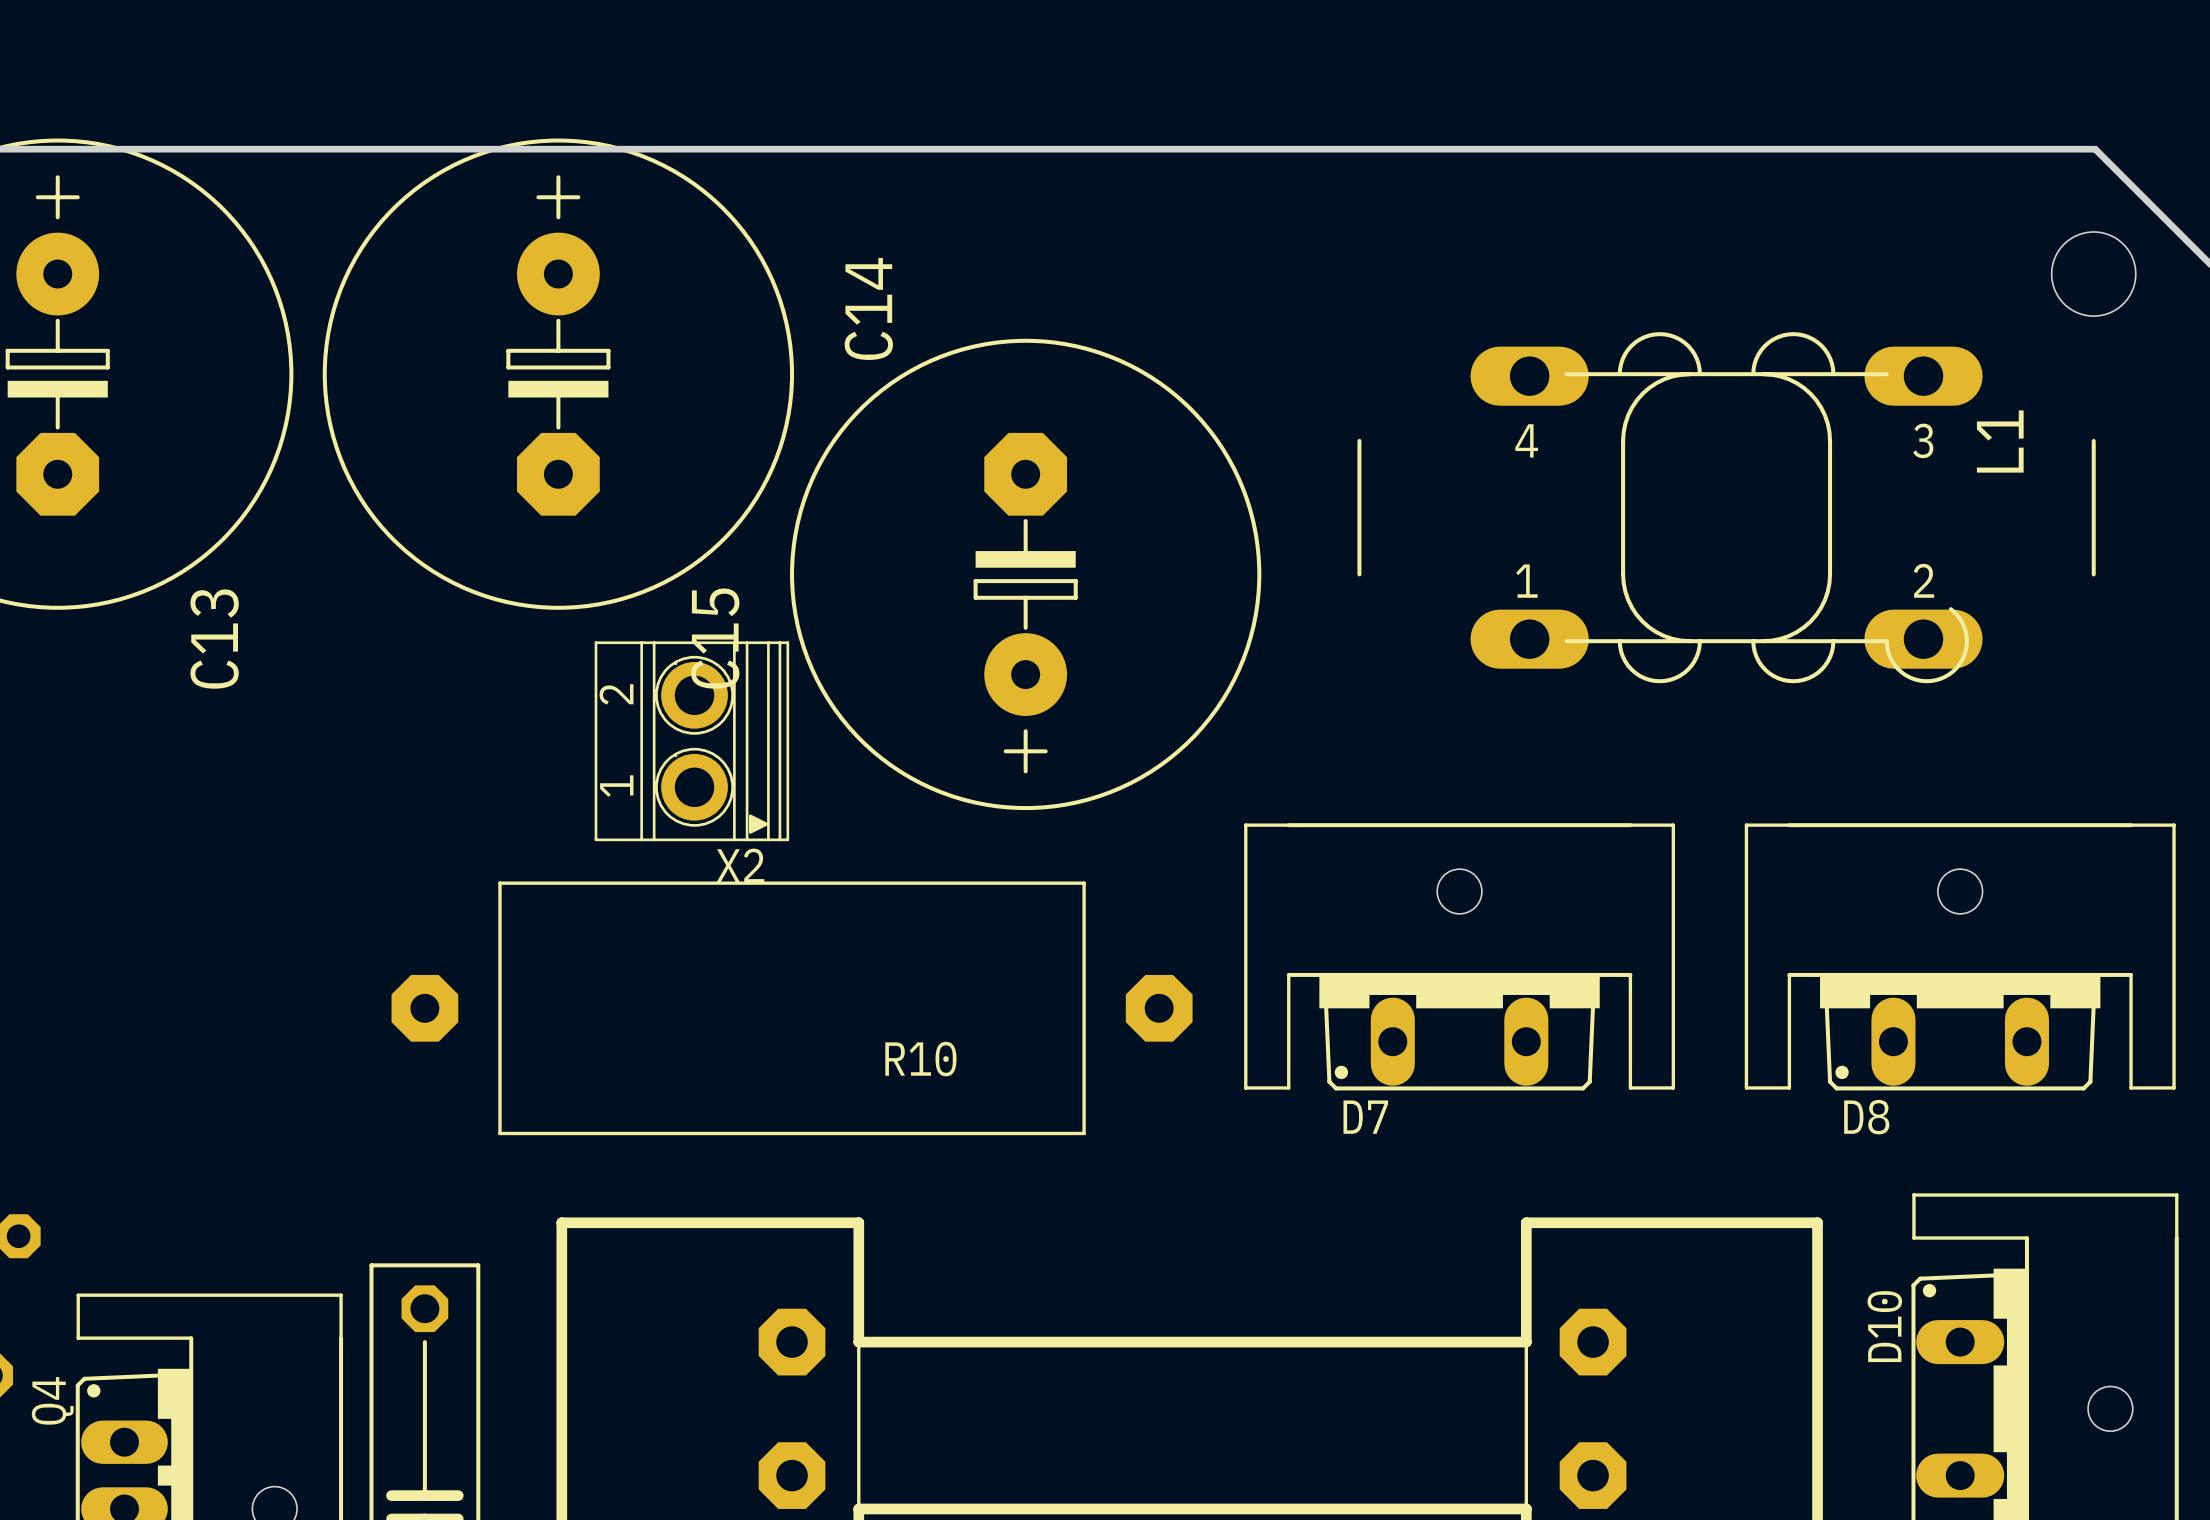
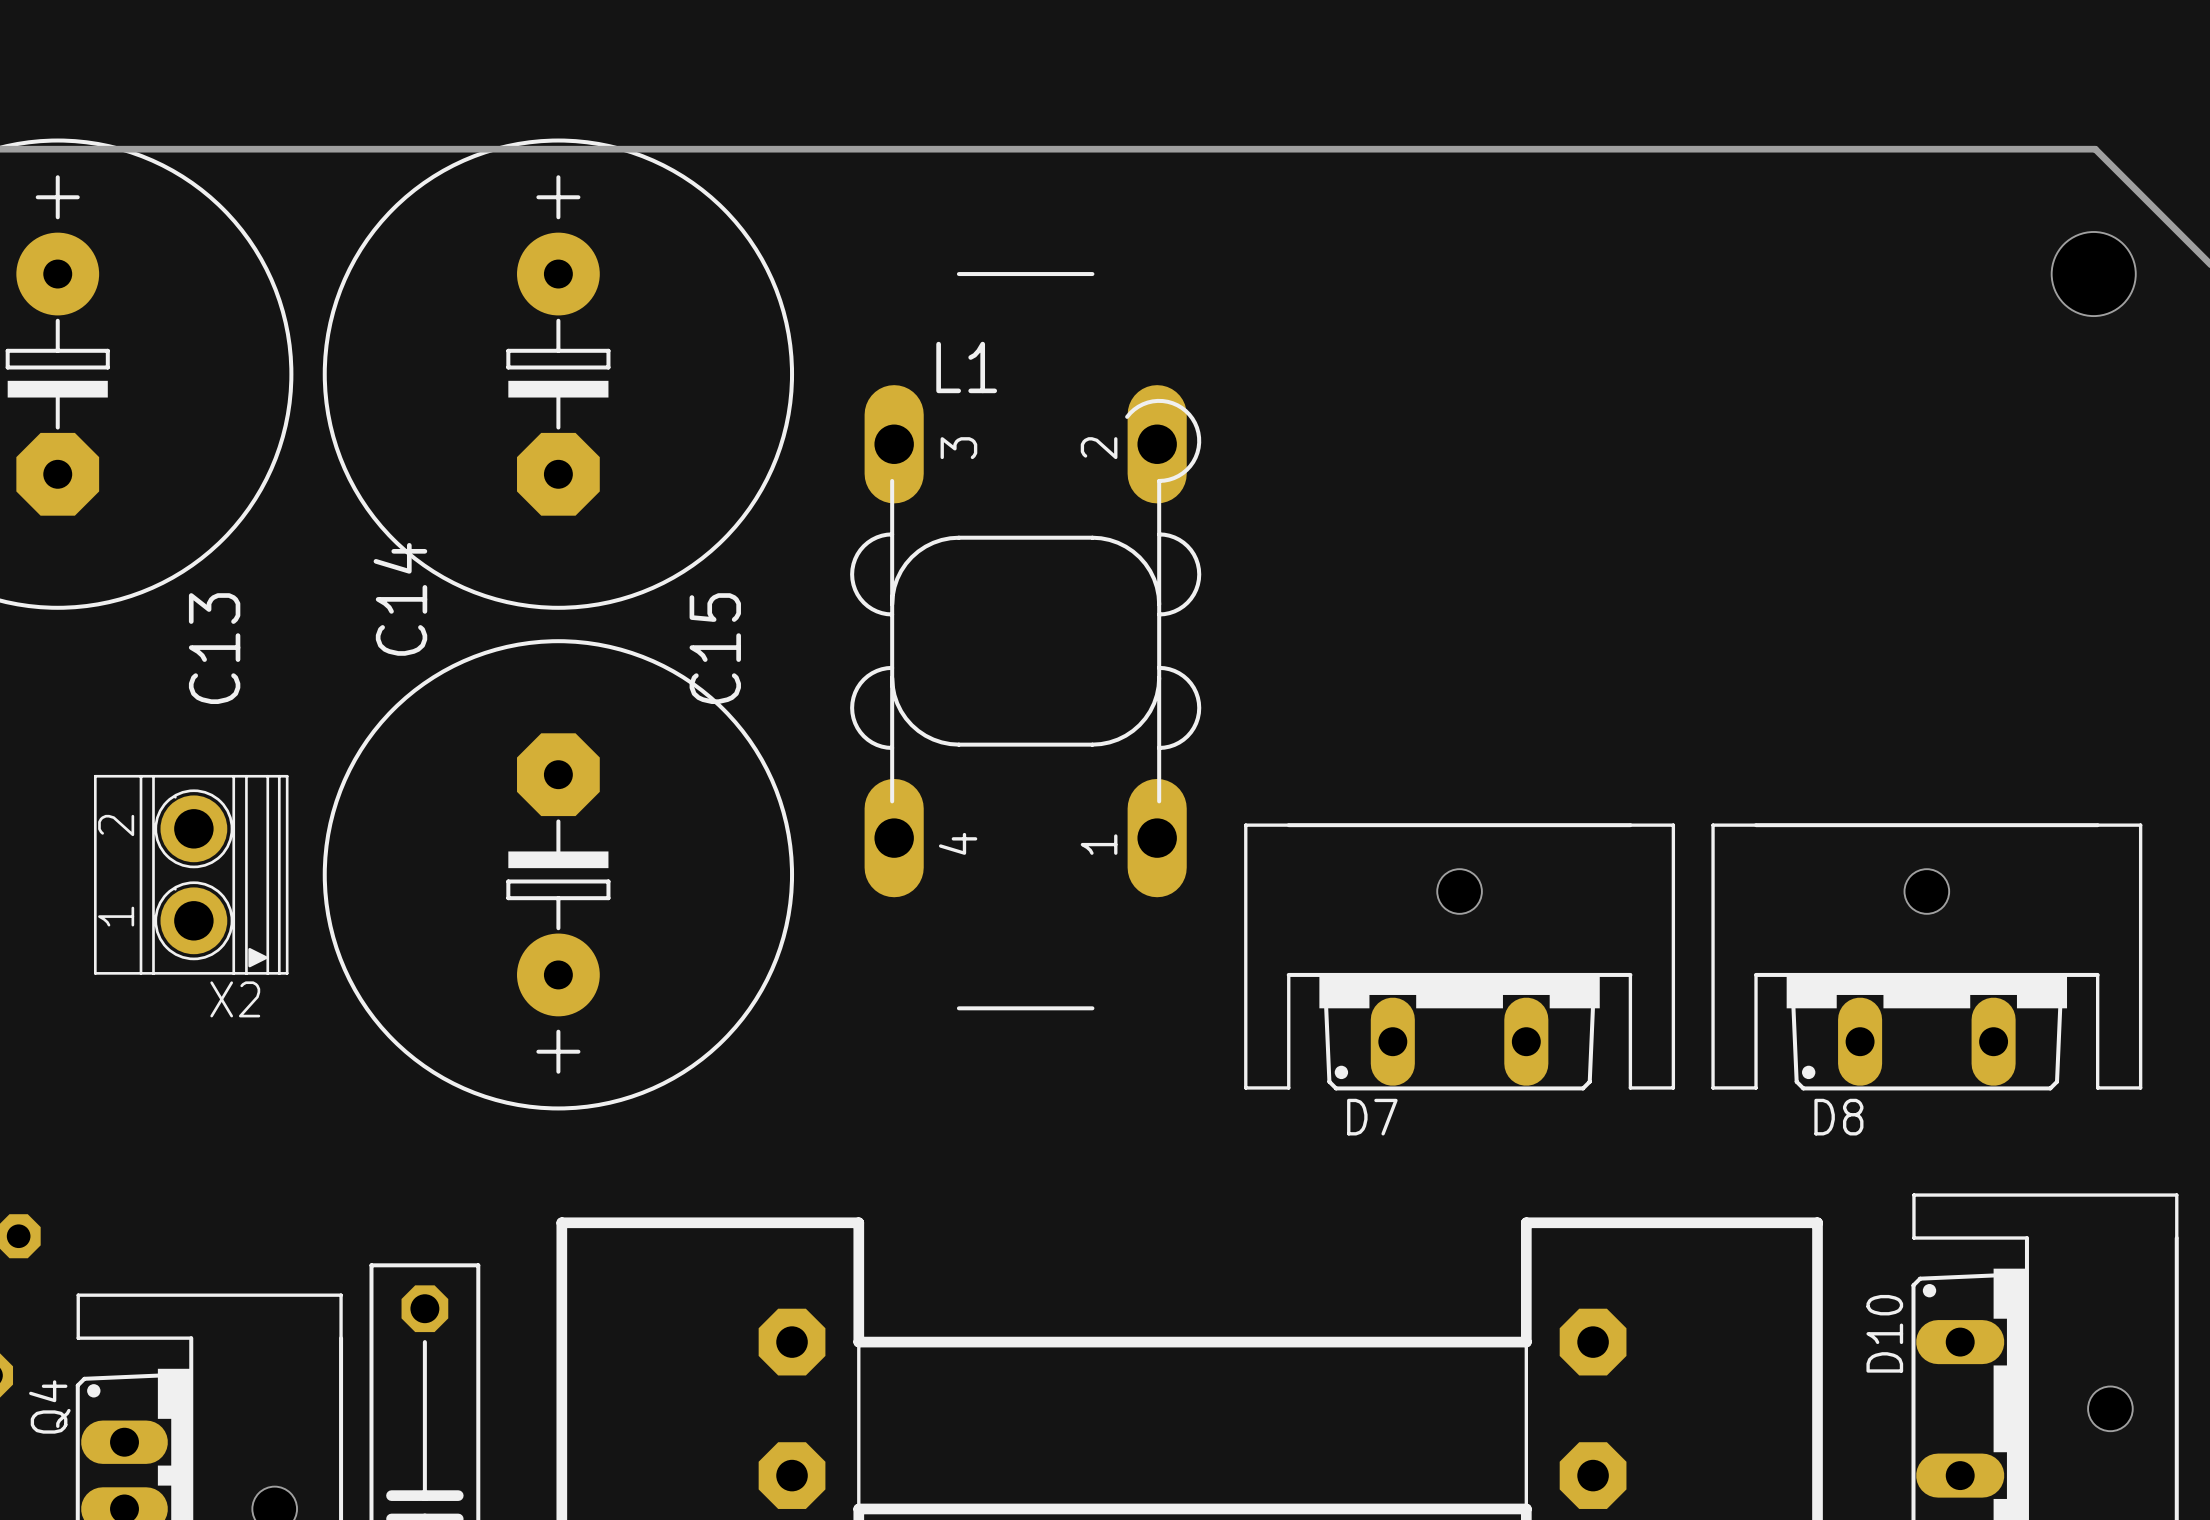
L1 rotation: 0° (1726, 507) -> 90° counterclockwise (1025, 641)
L1 position: (1726, 507) -> (1025, 641)
C14 position: (1025, 574) -> (558, 874)
X2 position: (691, 741) -> (191, 874)
part position: (1960, 956) -> (1926, 956)
R10: (792, 1008) -> none
D8 position: (1960, 1032) -> (1926, 1032)

